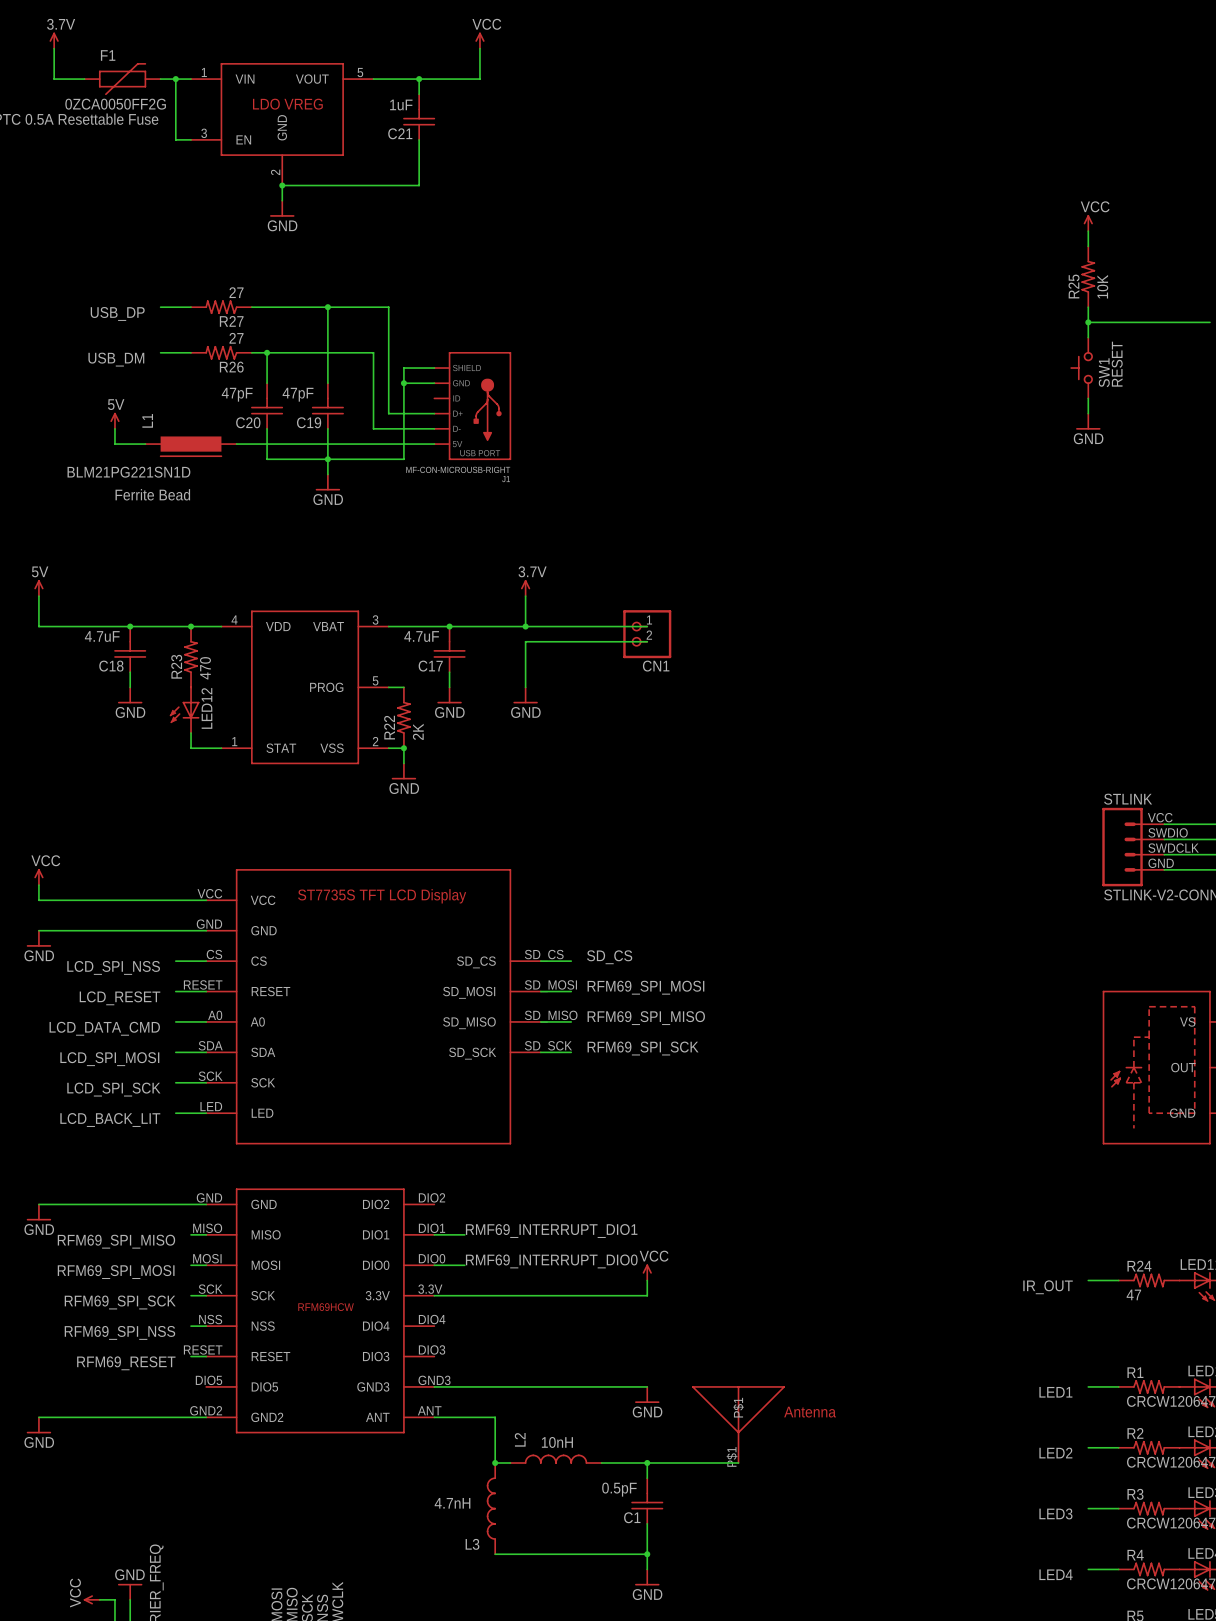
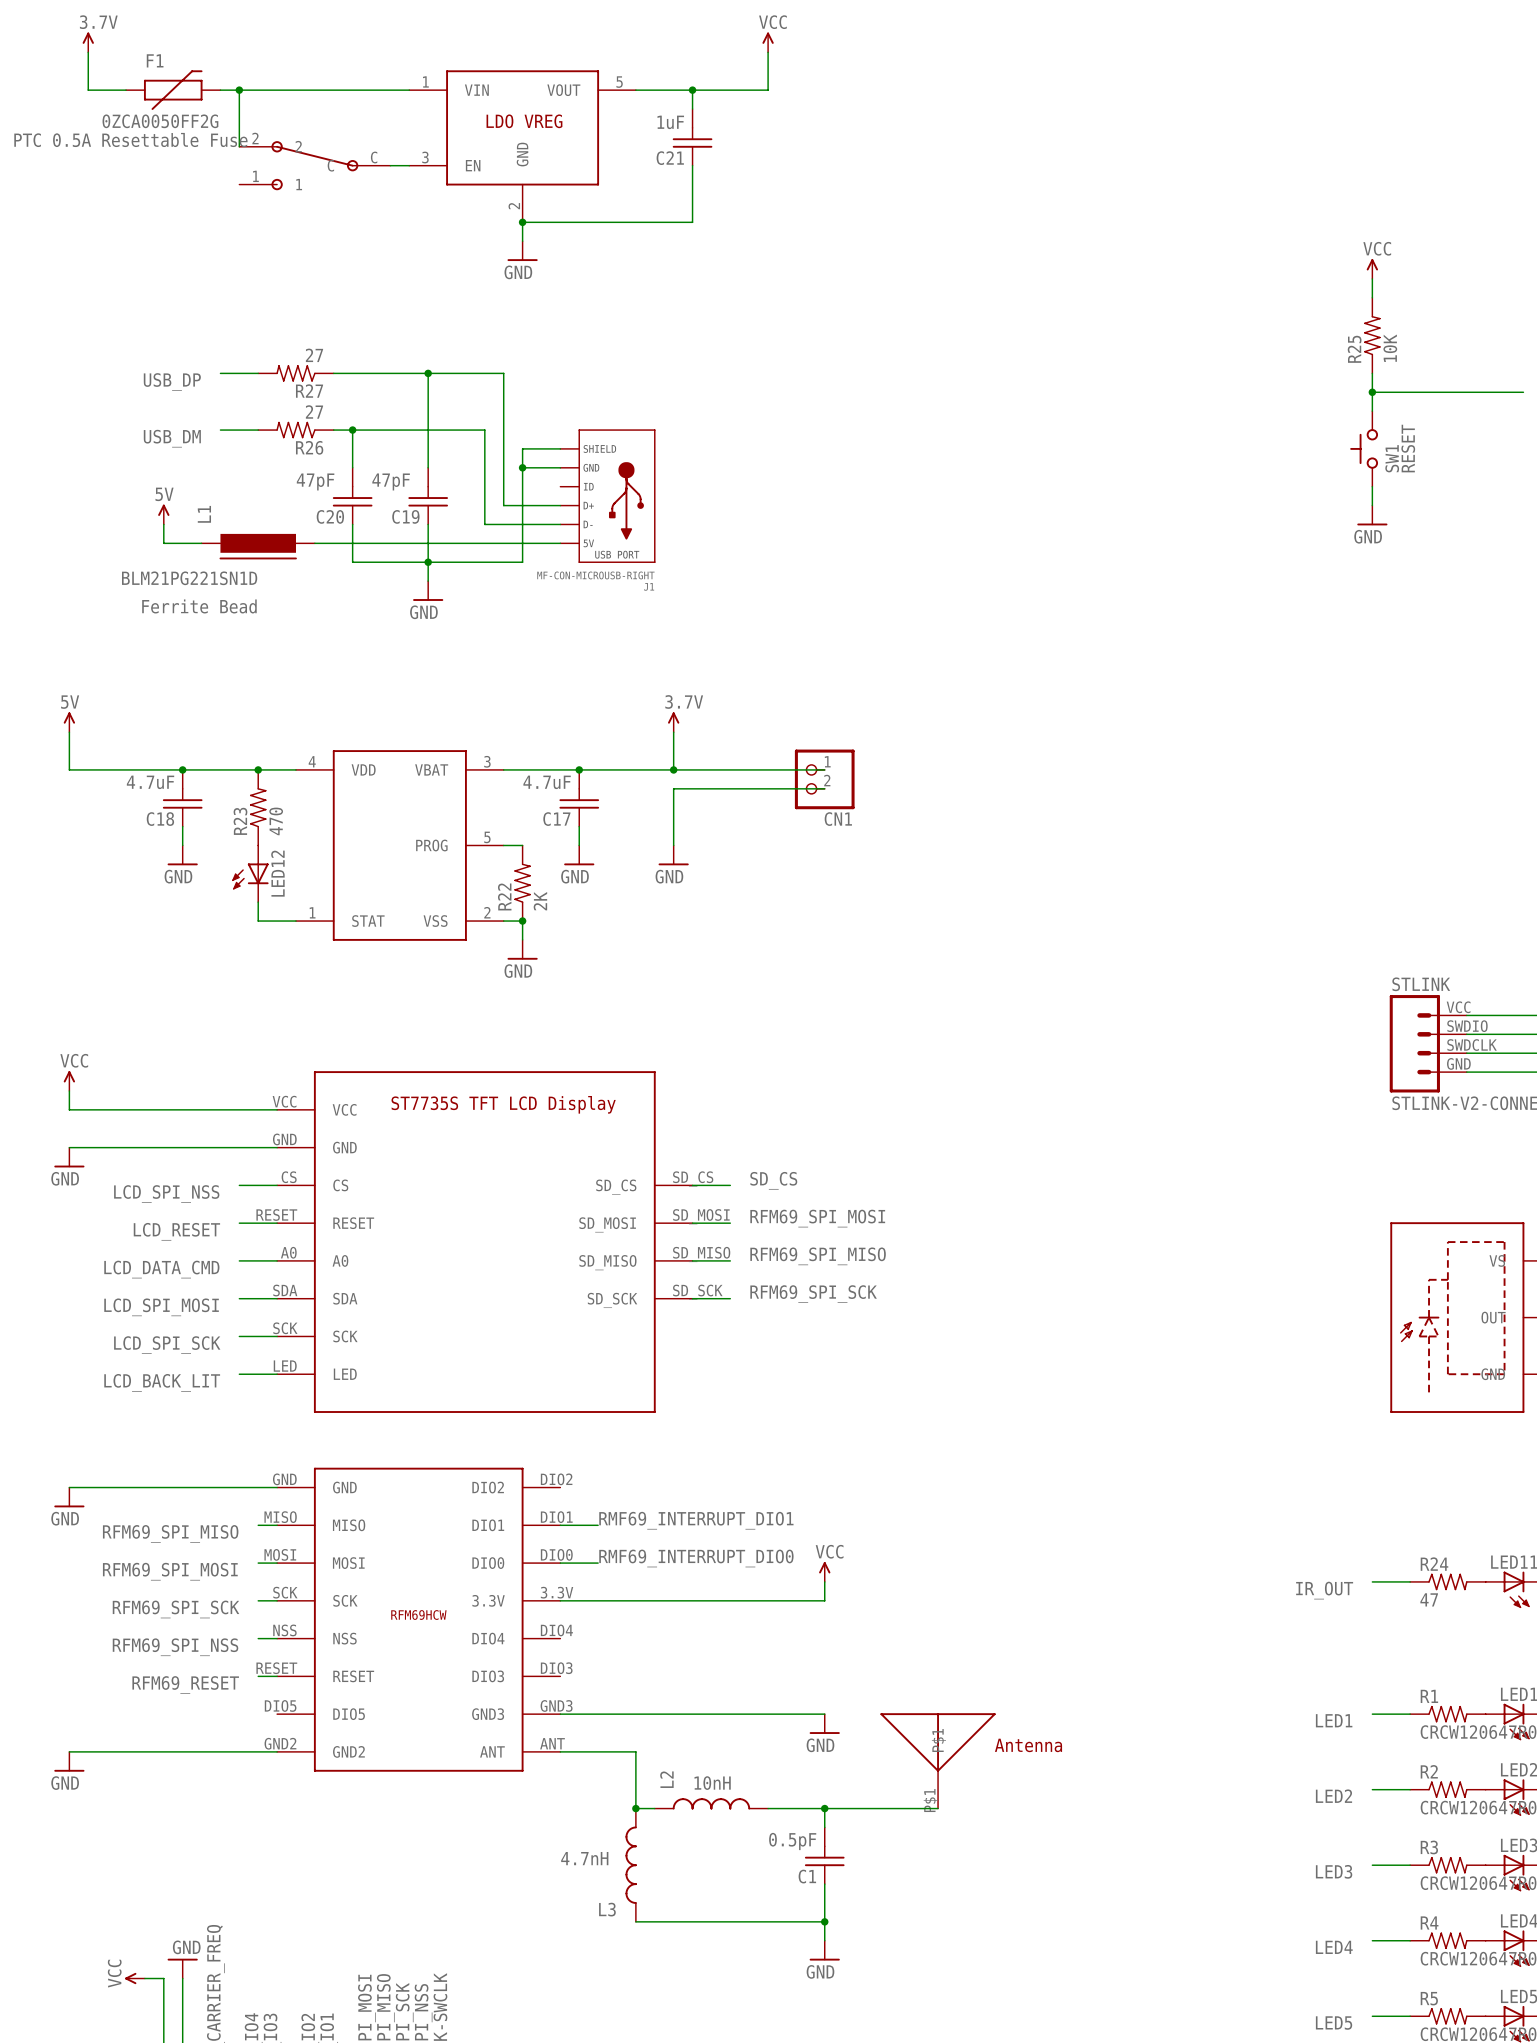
power symbol position: VCC (479, 40) -> VCC (768, 42)
wire: (479, 48) (479, 79) (373, 79) -> (768, 52) (768, 90) (635, 90)
wire: none -> (258, 90) (409, 90)
wire: (419, 79) (419, 94) -> (692, 90) (692, 109)
junction: (419, 79) -> none
junction: none -> (692, 90)
C21 position: (419, 117) -> (692, 137)
wire: (175, 124) (175, 139) (191, 139) -> none
part position: (282, 124) -> (522, 146)
part: none -> (314, 165)
wire: none -> (390, 165) (409, 165)
wire: (419, 139) (419, 185) -> (692, 165) (692, 222) (541, 222)
junction: (282, 185) -> none
wire: (403, 185) (282, 185) (282, 200) -> (522, 222) (522, 241)
junction: none -> (522, 222)
power symbol position: GND (282, 208) -> GND (522, 251)

